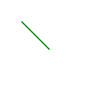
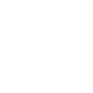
wire: (21, 21) (49, 49) -> none

